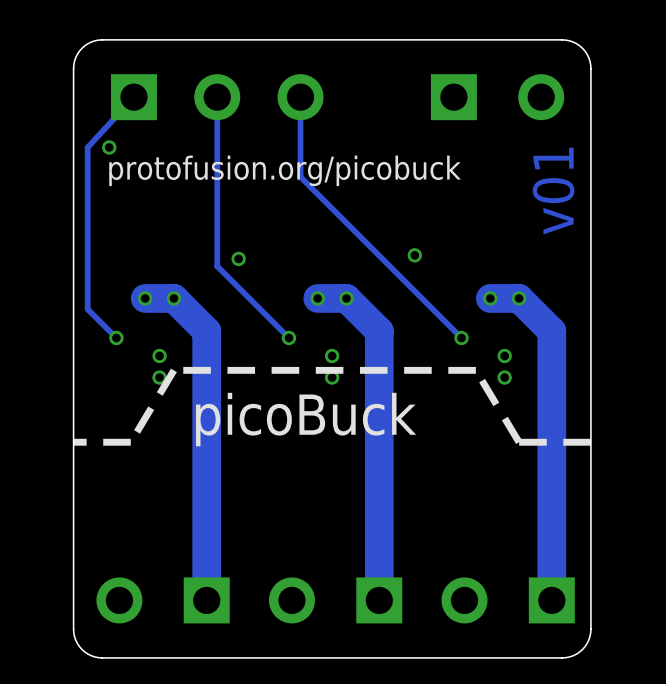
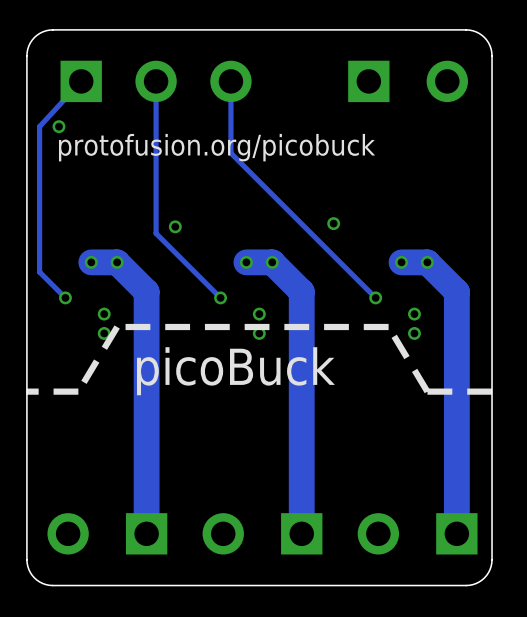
text: v01 (553, 191) -> none

